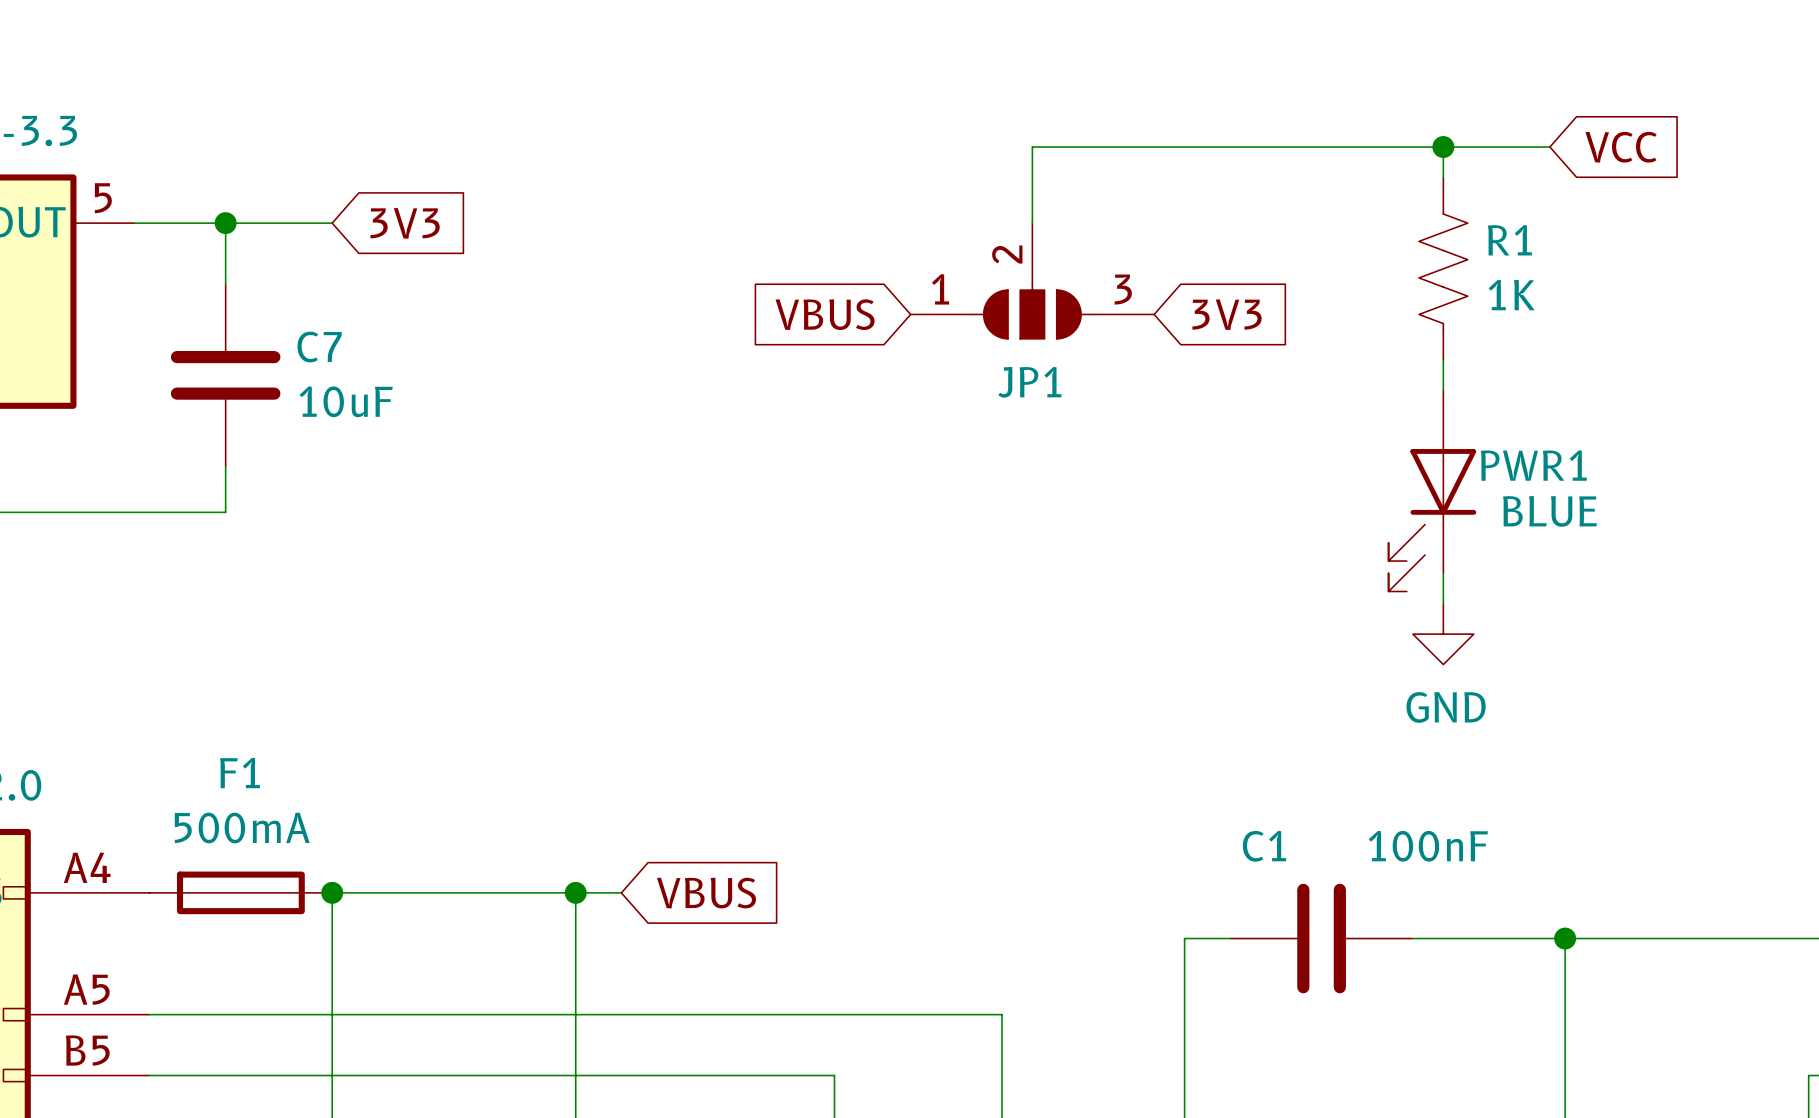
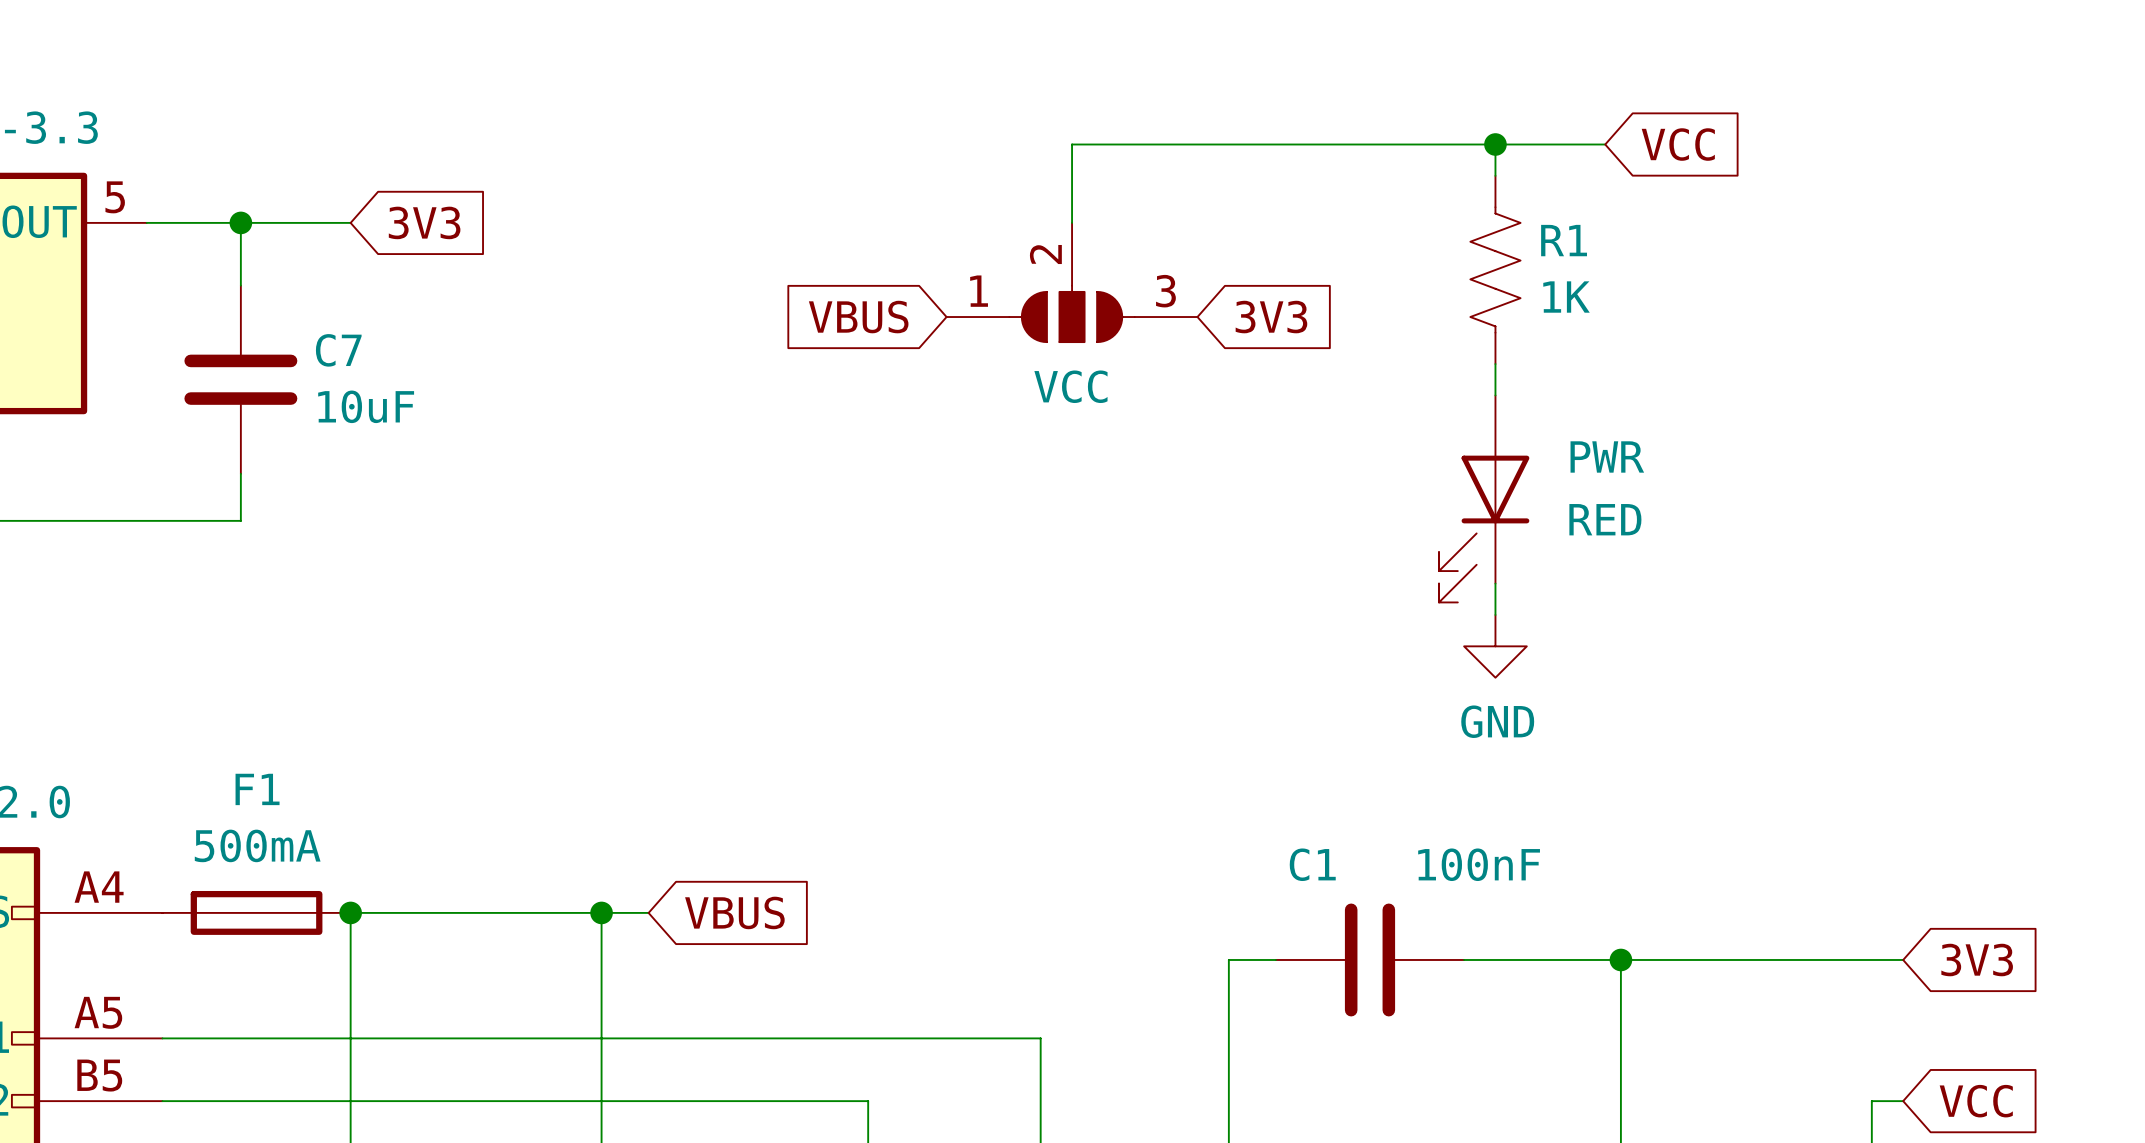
JP1 name: JP1 (1029, 382) -> VCC (1070, 386)
PWR1 name: PWR1 (1533, 465) -> PWR (1607, 456)
PWR1 value: BLUE (1549, 511) -> RED (1605, 519)

